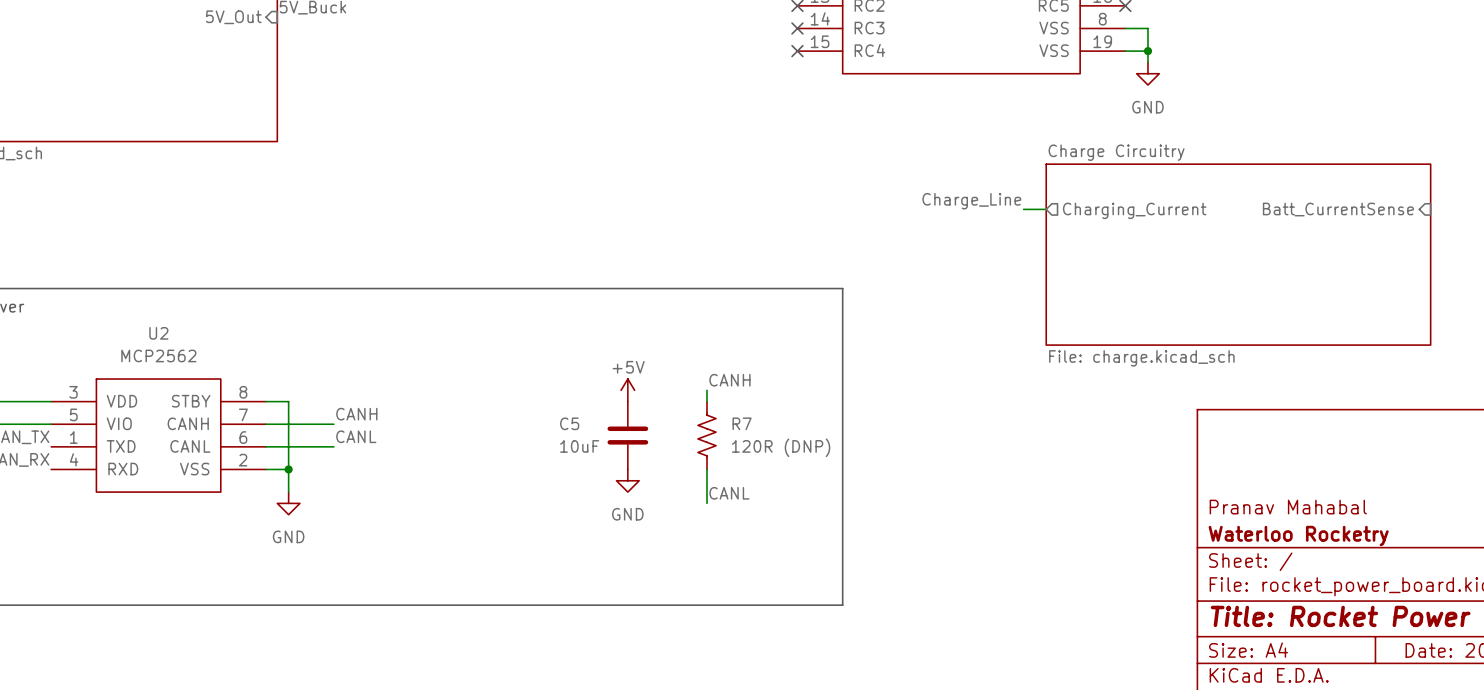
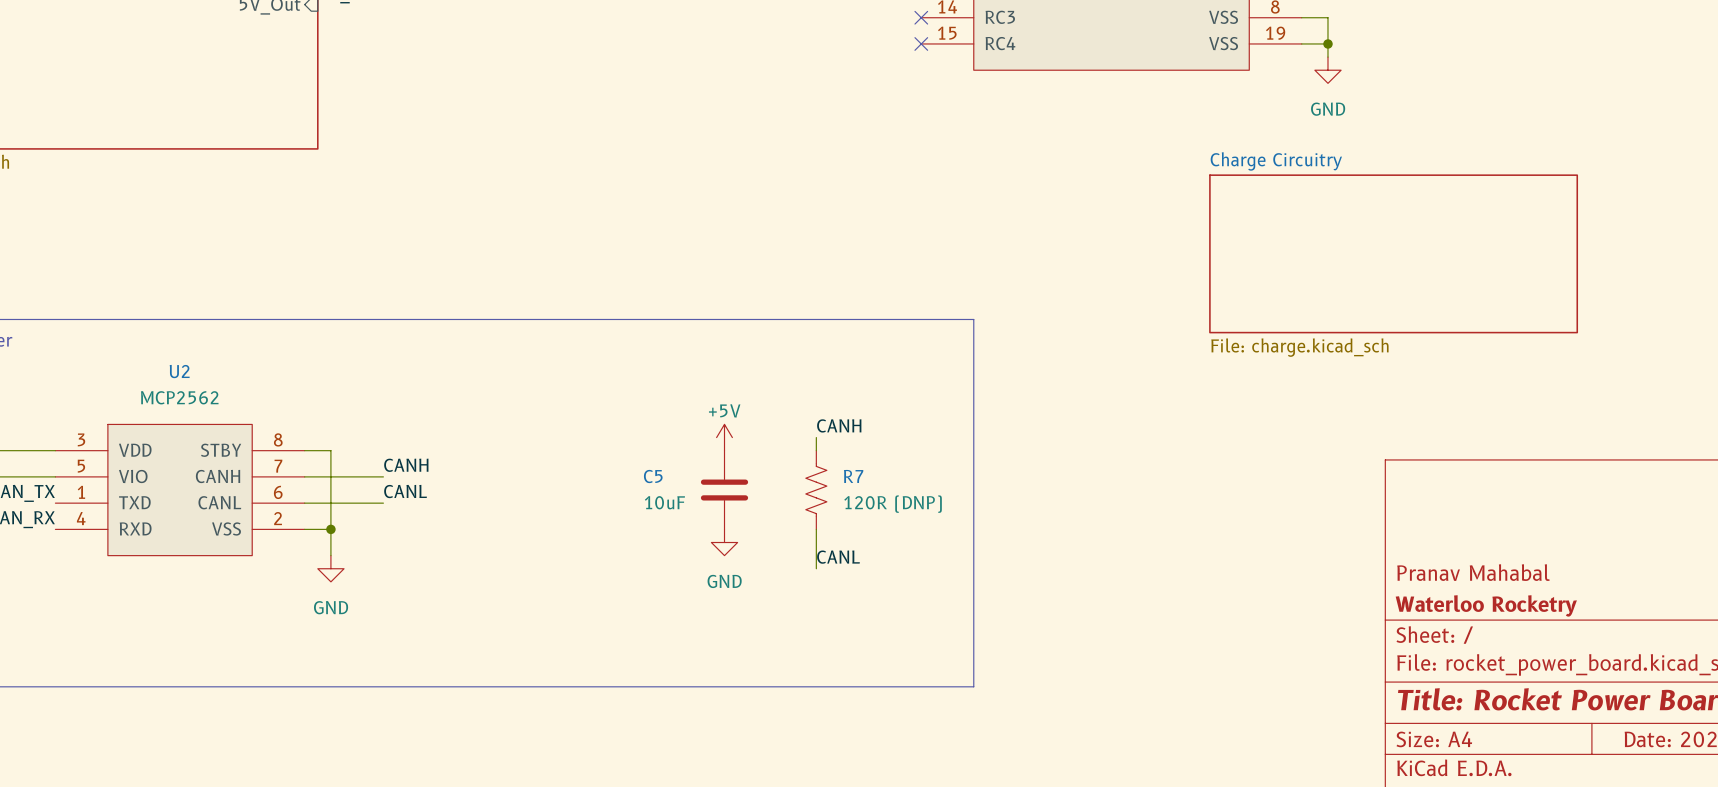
label: Charge_Line (971, 201) -> none
wire: (1023, 209) (1046, 209) -> none
sheet pin: Batt_CurrentSense (1338, 209) -> none
sheet pin: Charging_Current (1134, 210) -> none
sheet Charge Circuitry: none -> File: charge.kicad_sch (1393, 253)
sheet Charge Circuitry: File: charge.kicad_sch (1238, 254) -> none

